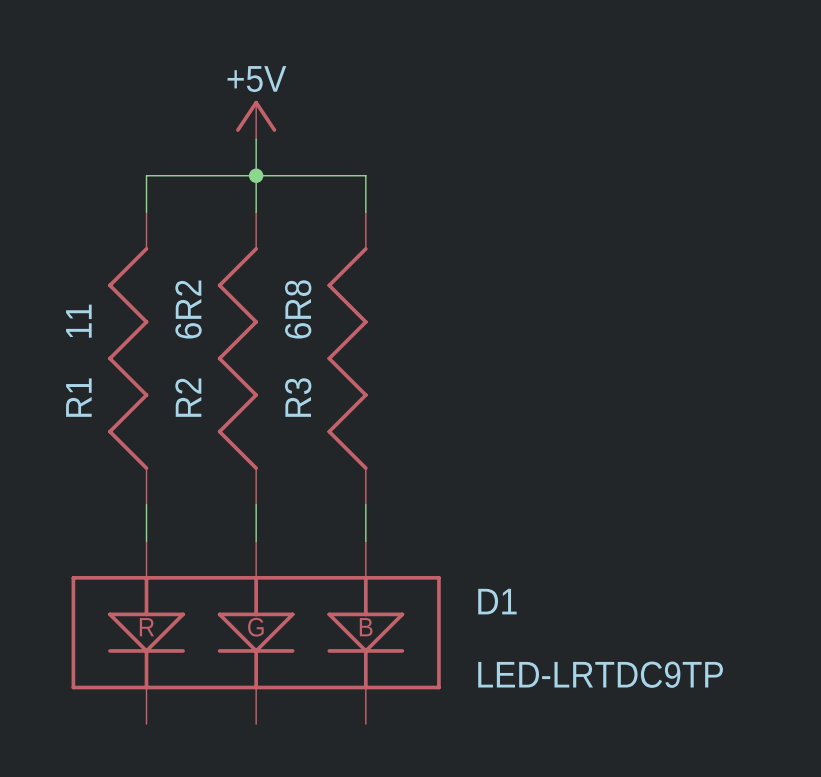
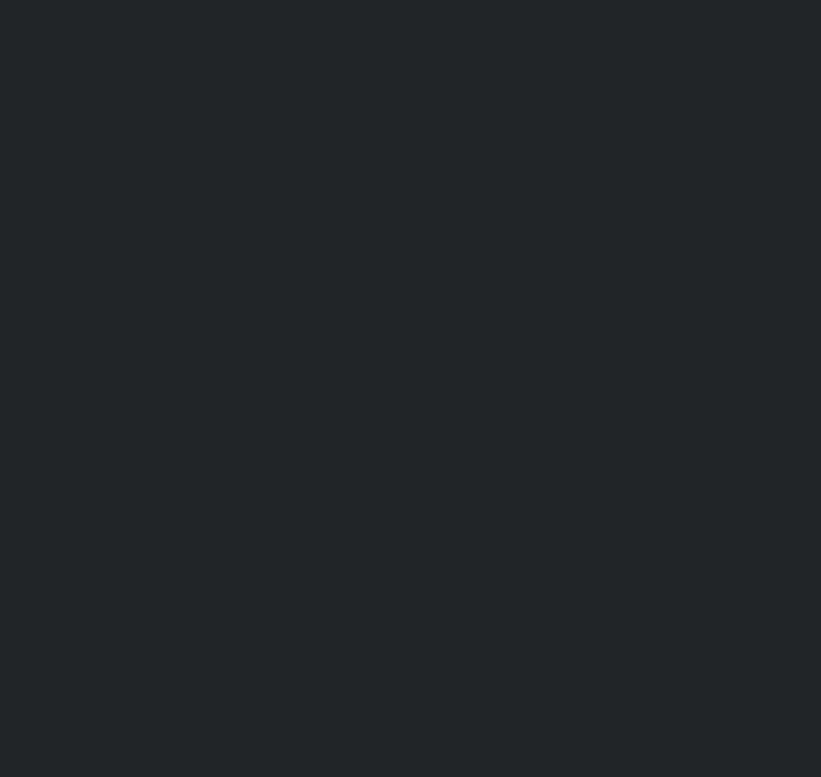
power symbol: +5V (256, 120) -> none
wire: (256, 139) (256, 212) -> none
junction: (256, 175) -> none
wire: (146, 212) (146, 175) (365, 175) (365, 212) -> none
R1: 11 (128, 358) -> none
R2: 6R2 (237, 358) -> none
R3: 6R8 (347, 358) -> none
wire: (146, 504) (146, 541) -> none
wire: (256, 504) (256, 541) -> none
wire: (365, 504) (365, 541) -> none
D1: LED-LRTDC9TP (256, 632) -> none

